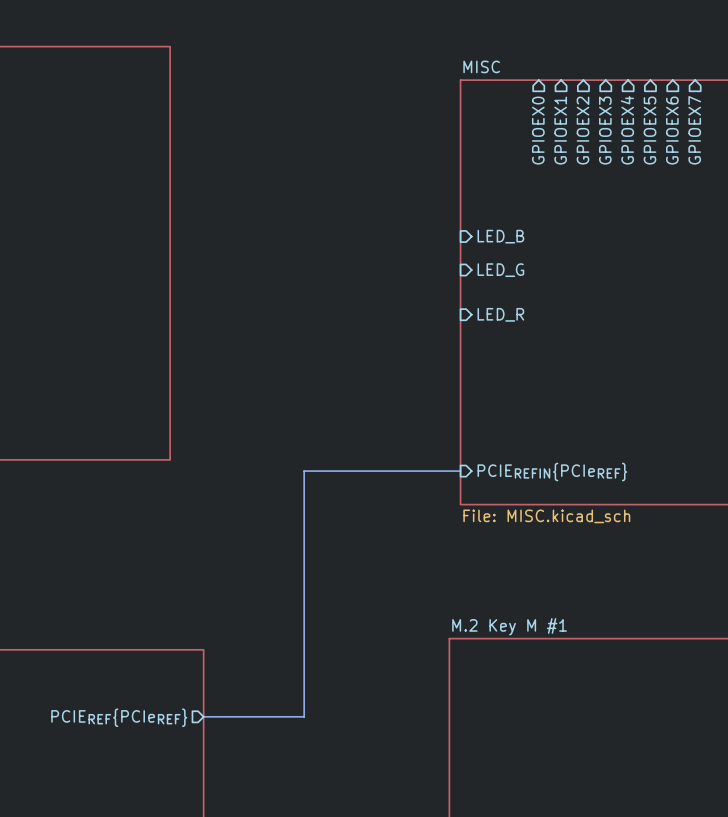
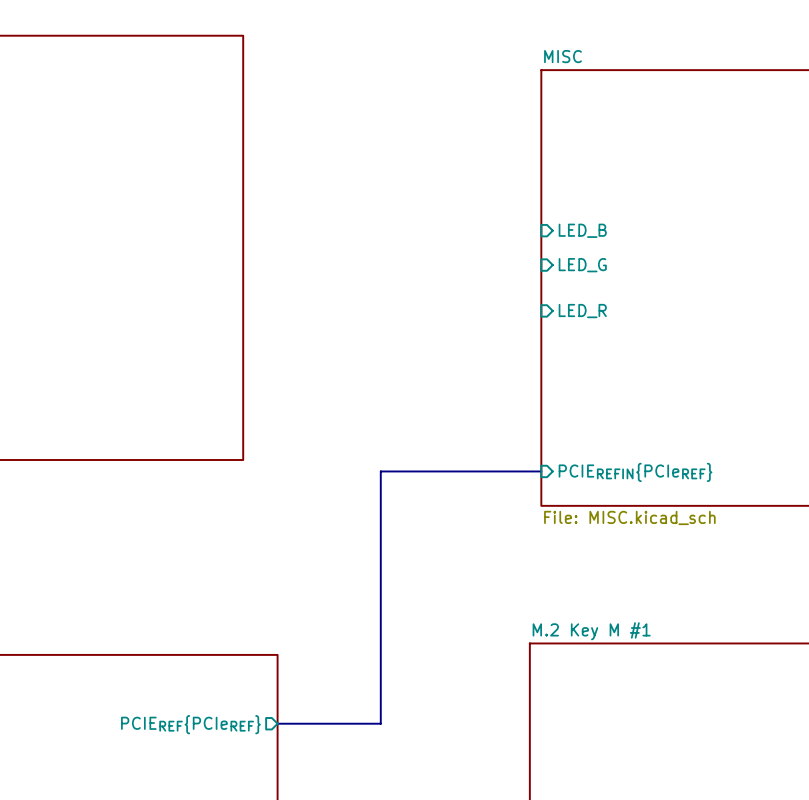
sheet pin: GPIOEX0 (538, 130) -> none
sheet pin: GPIOEX1 (560, 130) -> none
sheet pin: GPIOEX2 (583, 130) -> none
sheet pin: GPIOEX3 (605, 130) -> none
sheet pin: GPIOEX4 (627, 130) -> none
sheet pin: GPIOEX5 (650, 130) -> none
sheet pin: GPIOEX6 (672, 130) -> none
sheet pin: GPIOEX7 (694, 130) -> none

